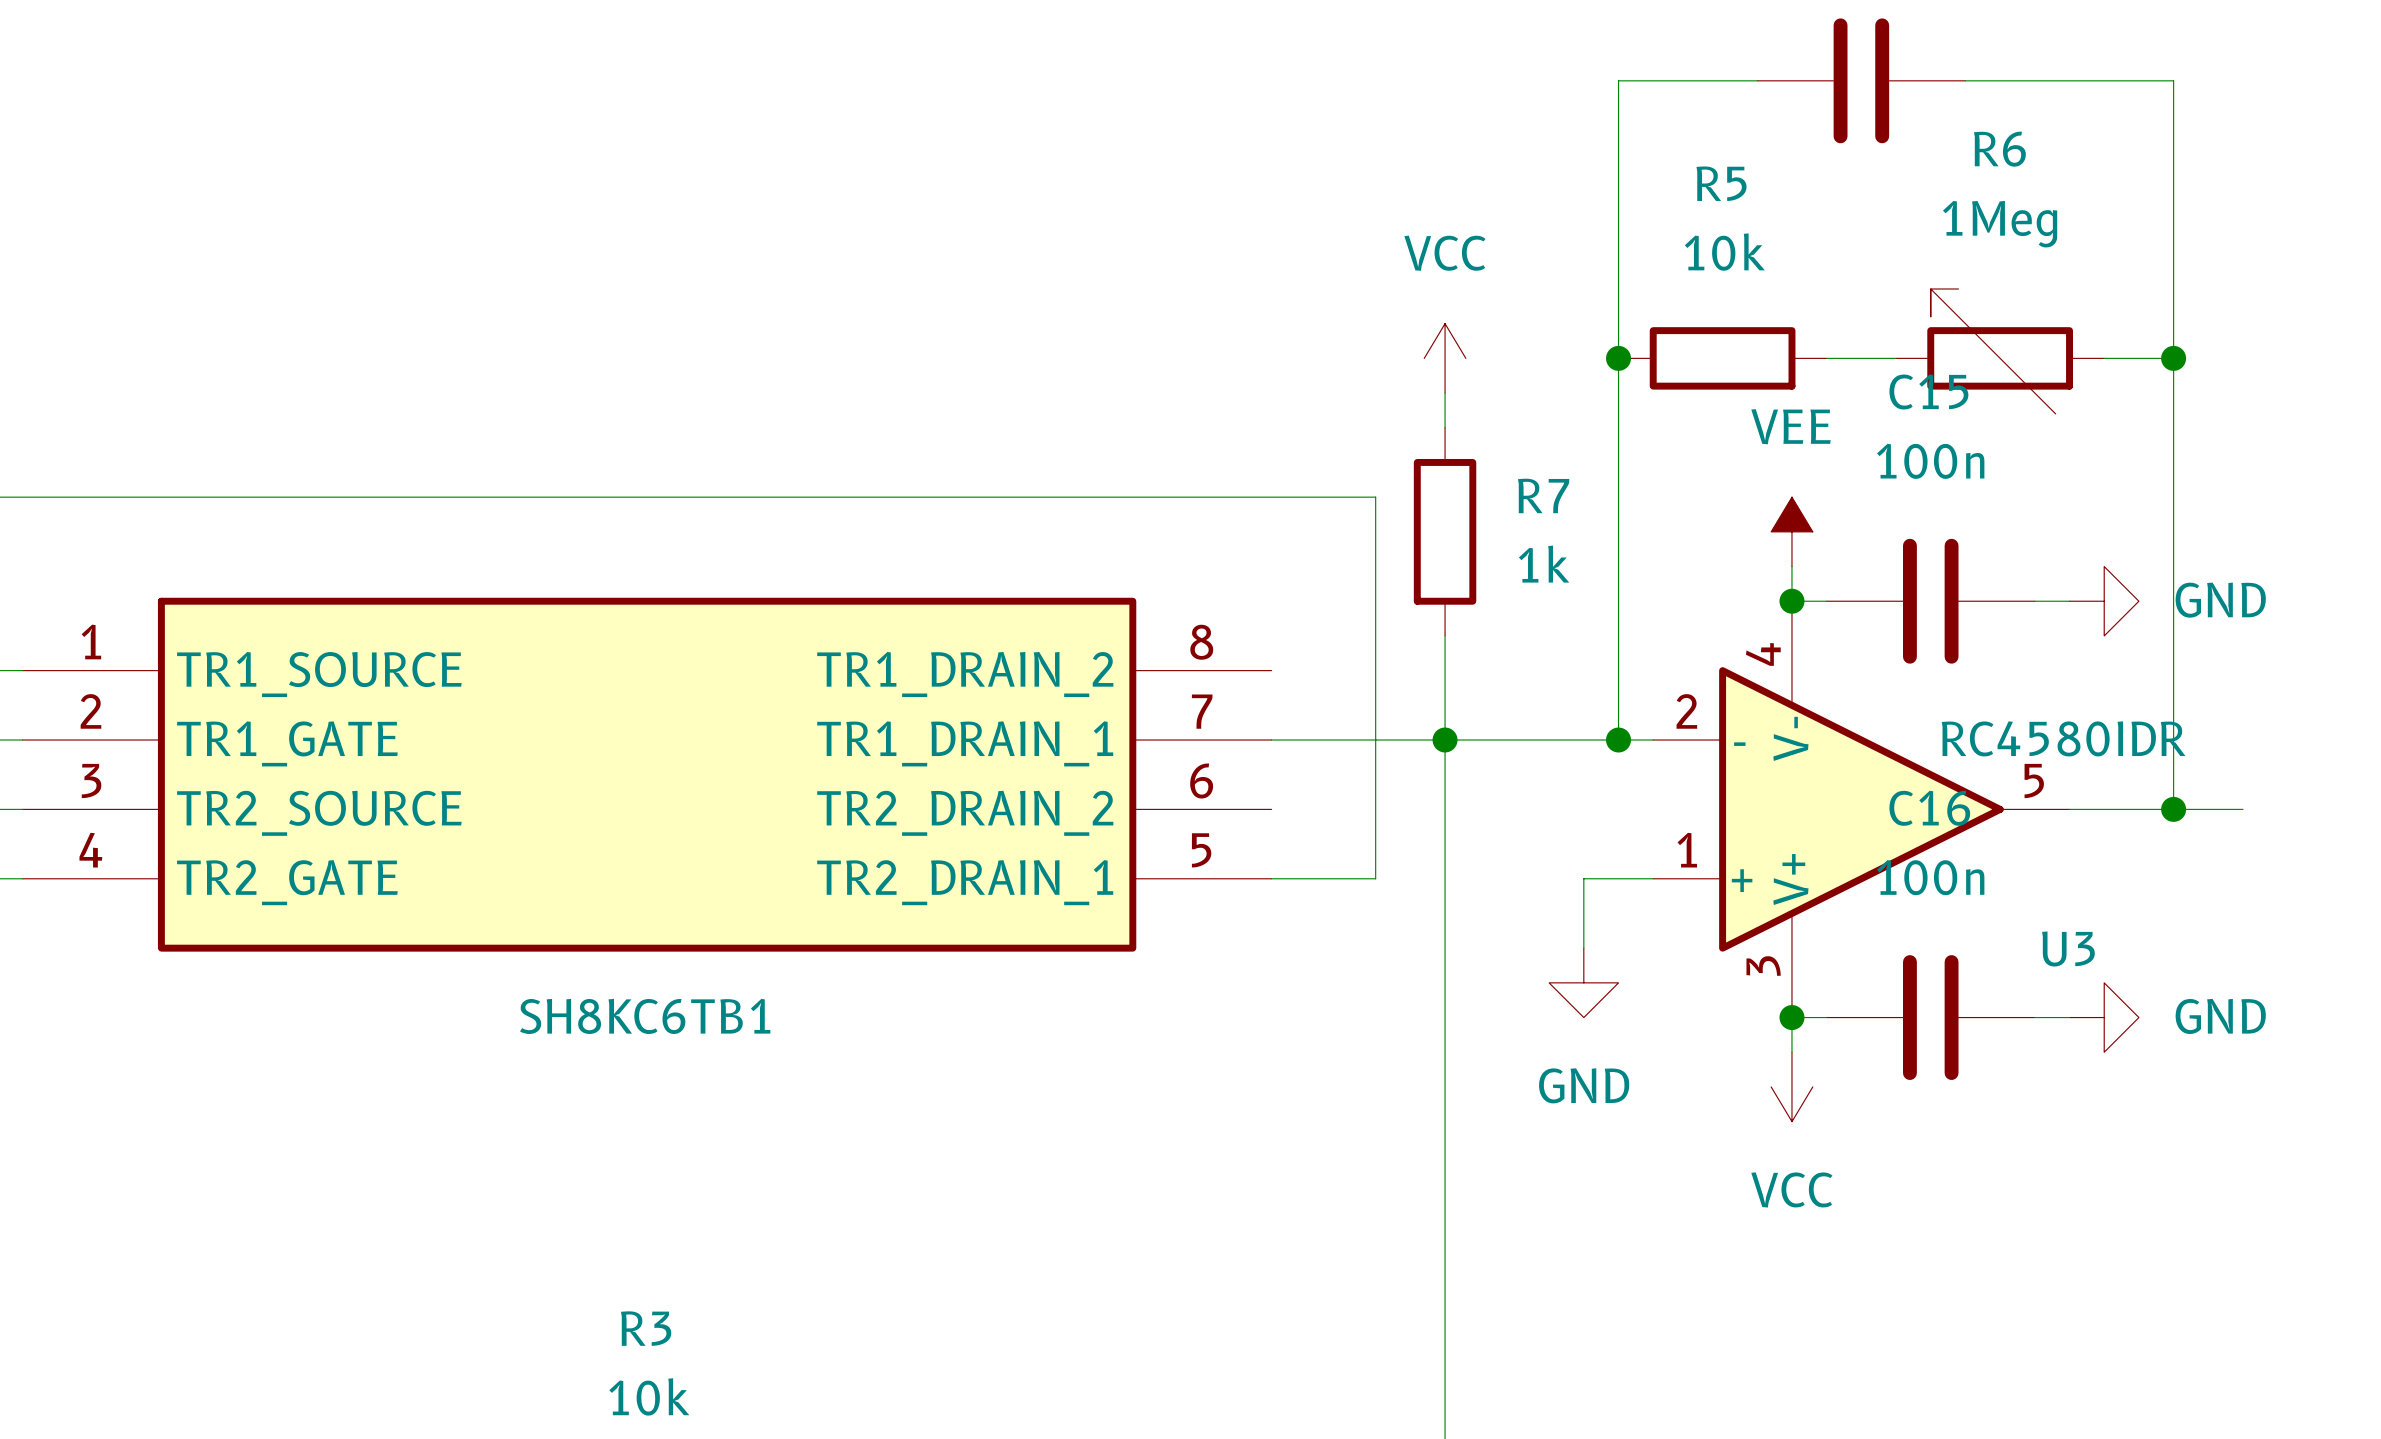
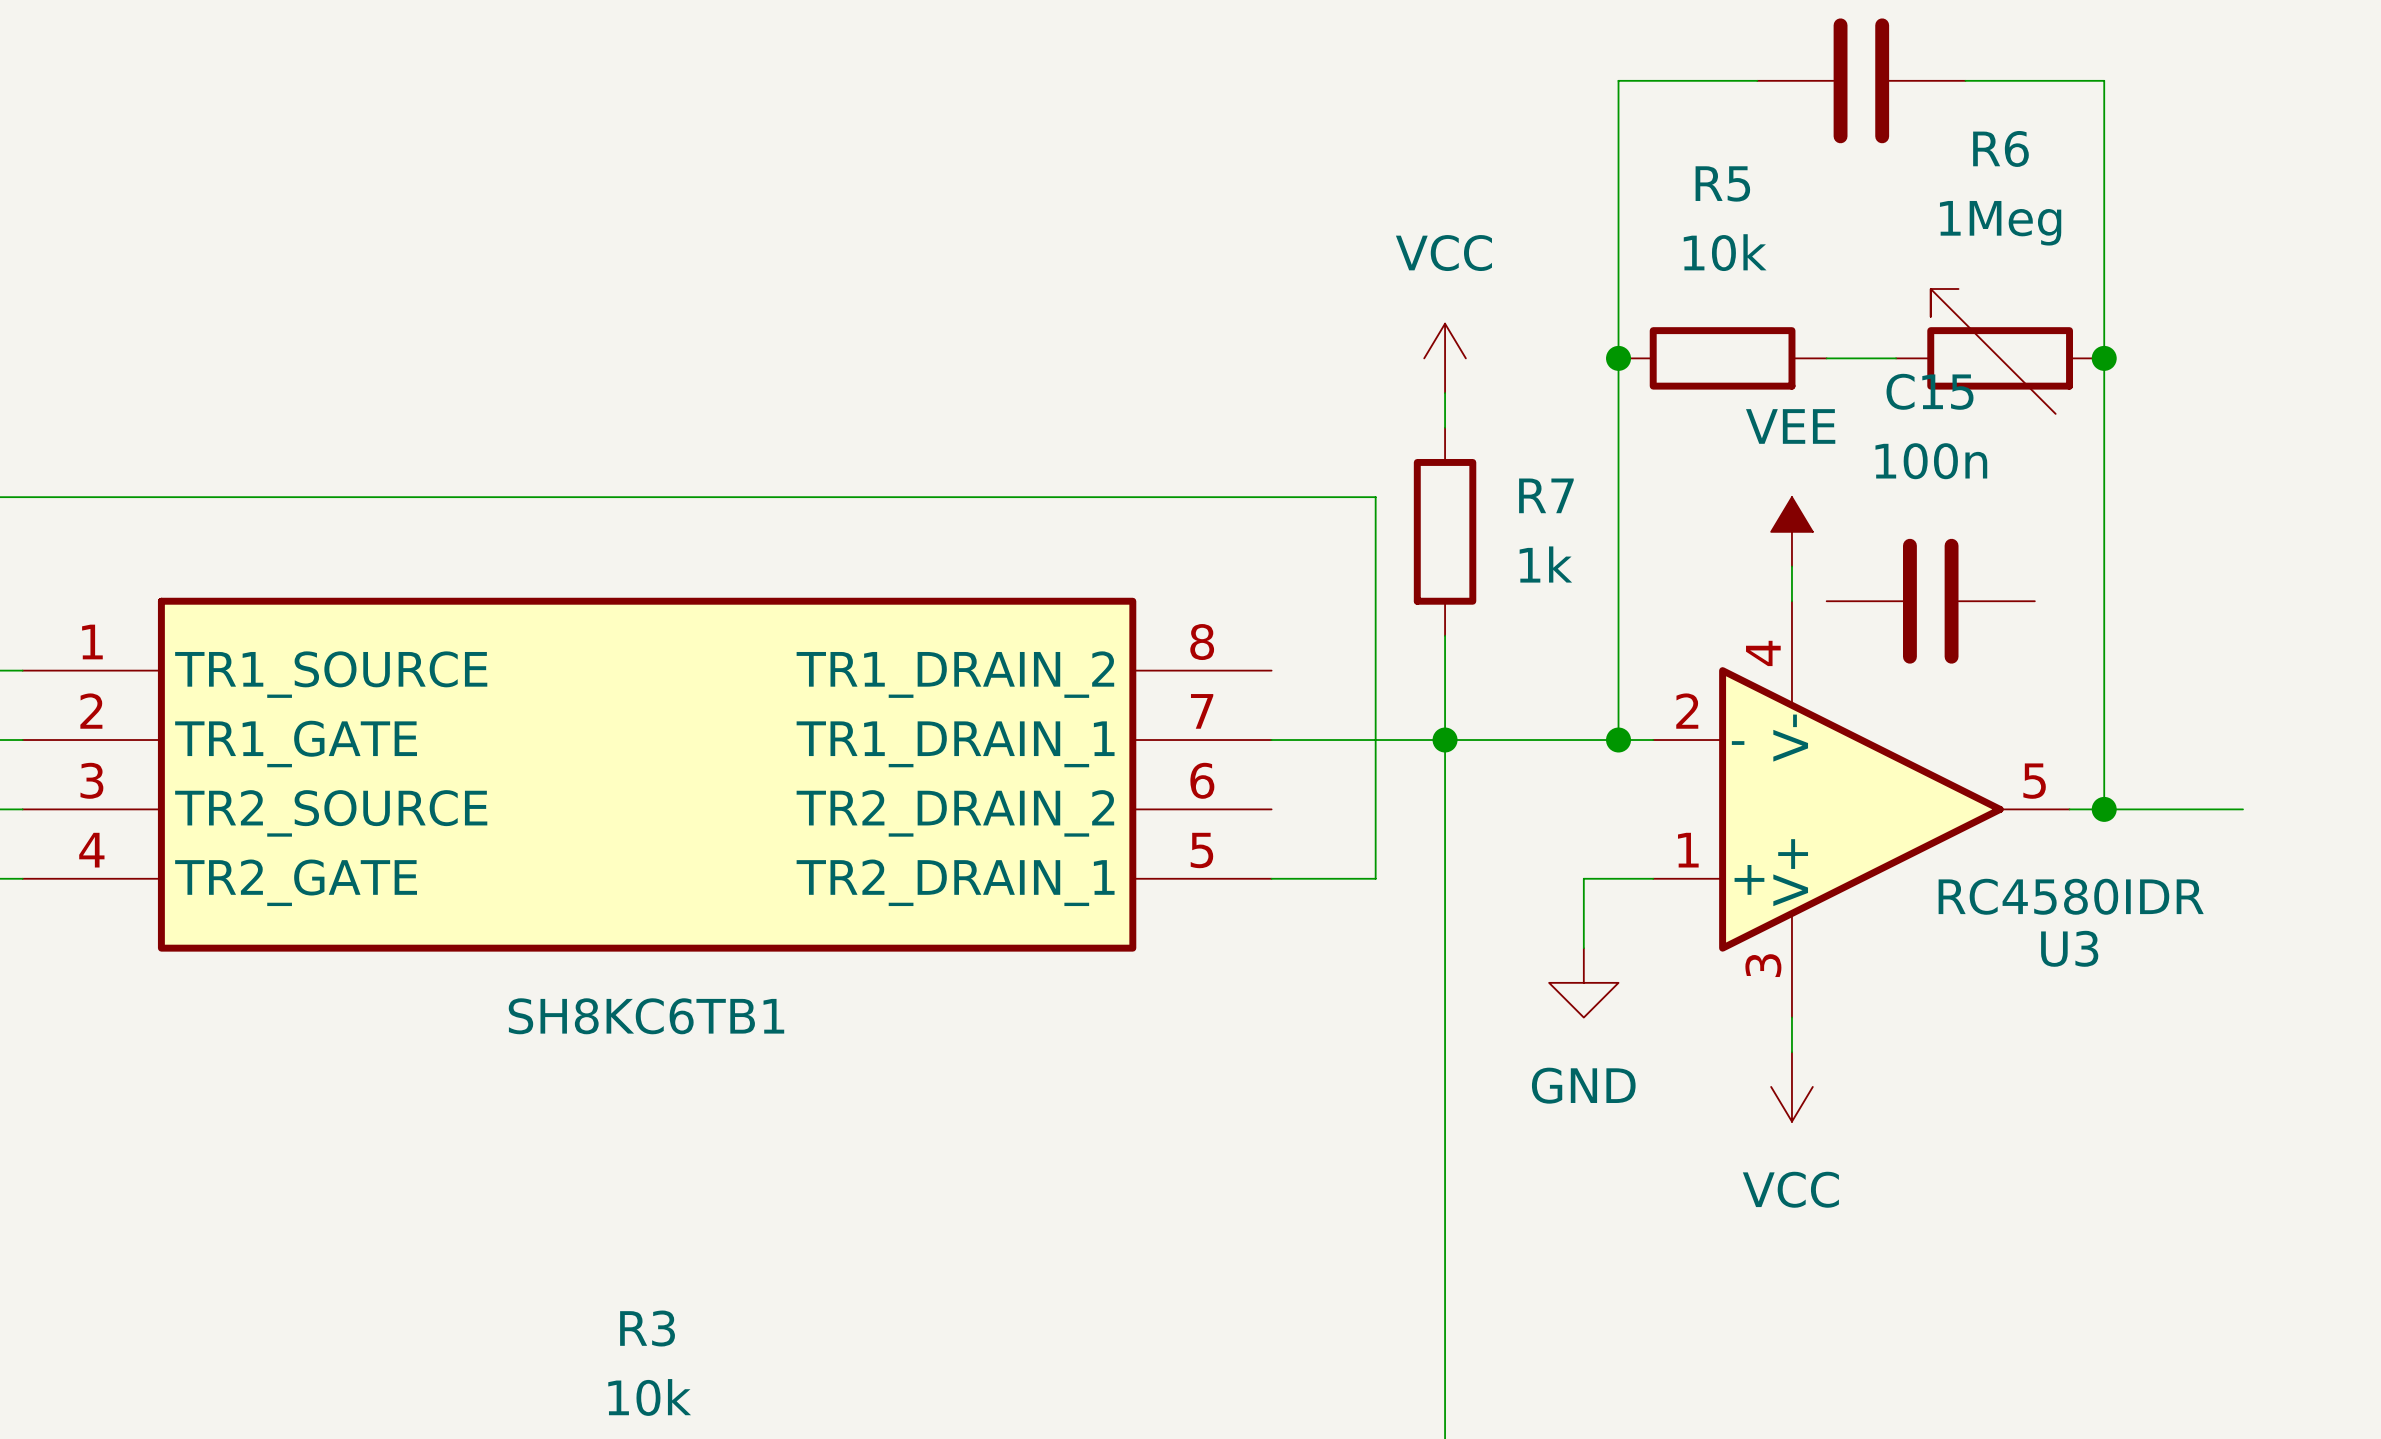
wire: (2104, 80) (2173, 80) (2173, 809) -> (2104, 80) (2104, 809)
wire: (2104, 358) (2173, 358) -> none
junction position: (2173, 358) -> (2104, 358)
wire: (1791, 601) (1826, 601) -> none
junction: (1791, 601) -> none
wire: (2034, 601) (2069, 601) -> none
power symbol: GND (2104, 601) -> none
U3 value position: RC4580IDR (2063, 738) -> RC4580IDR (2071, 896)
junction position: (2173, 809) -> (2104, 809)
wire: (1791, 1017) (1826, 1017) -> none
junction: (1791, 1017) -> none
C16: 100n (1930, 1017) -> none
wire: (2034, 1017) (2069, 1017) -> none
power symbol: GND (2104, 1017) -> none

